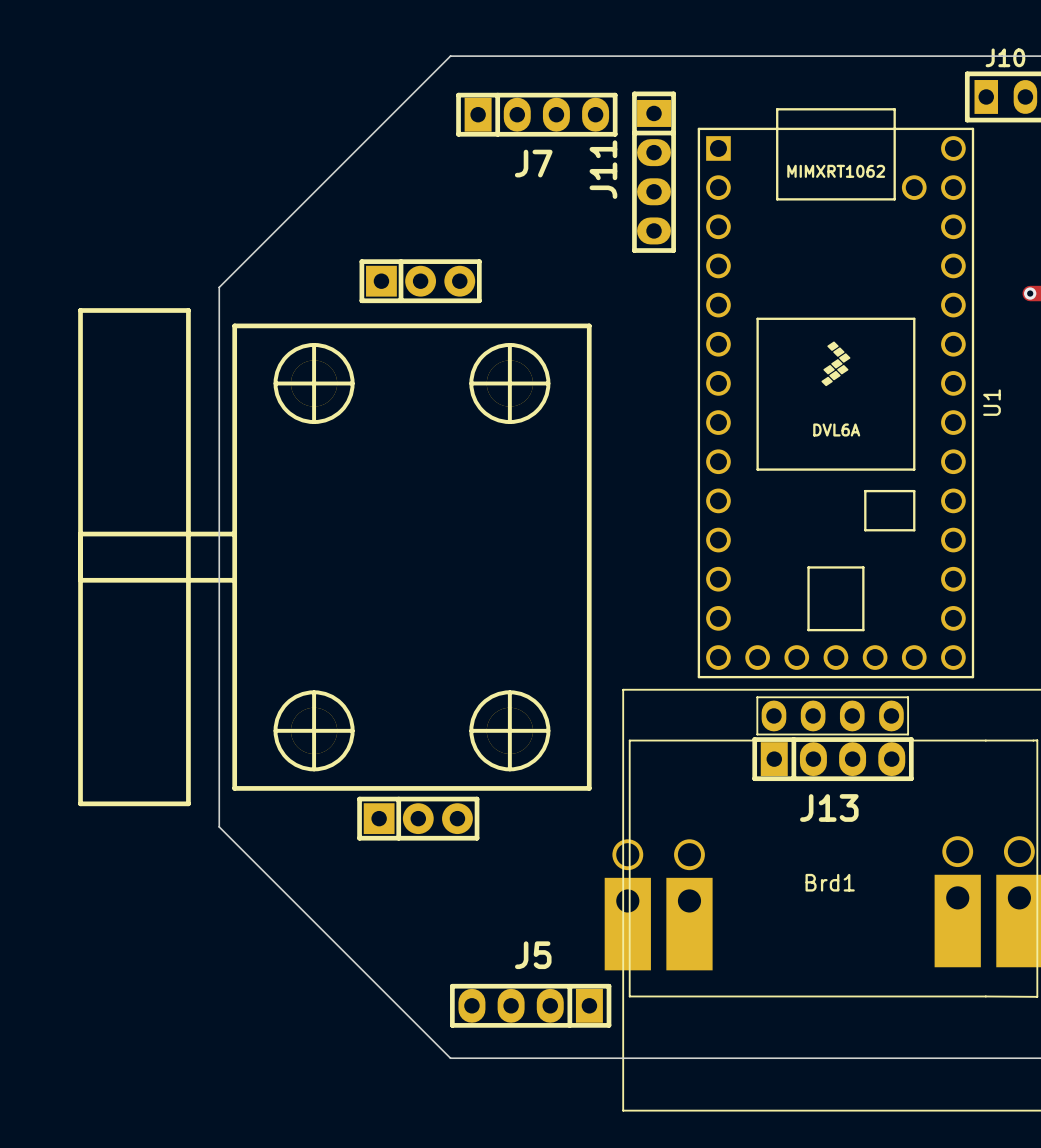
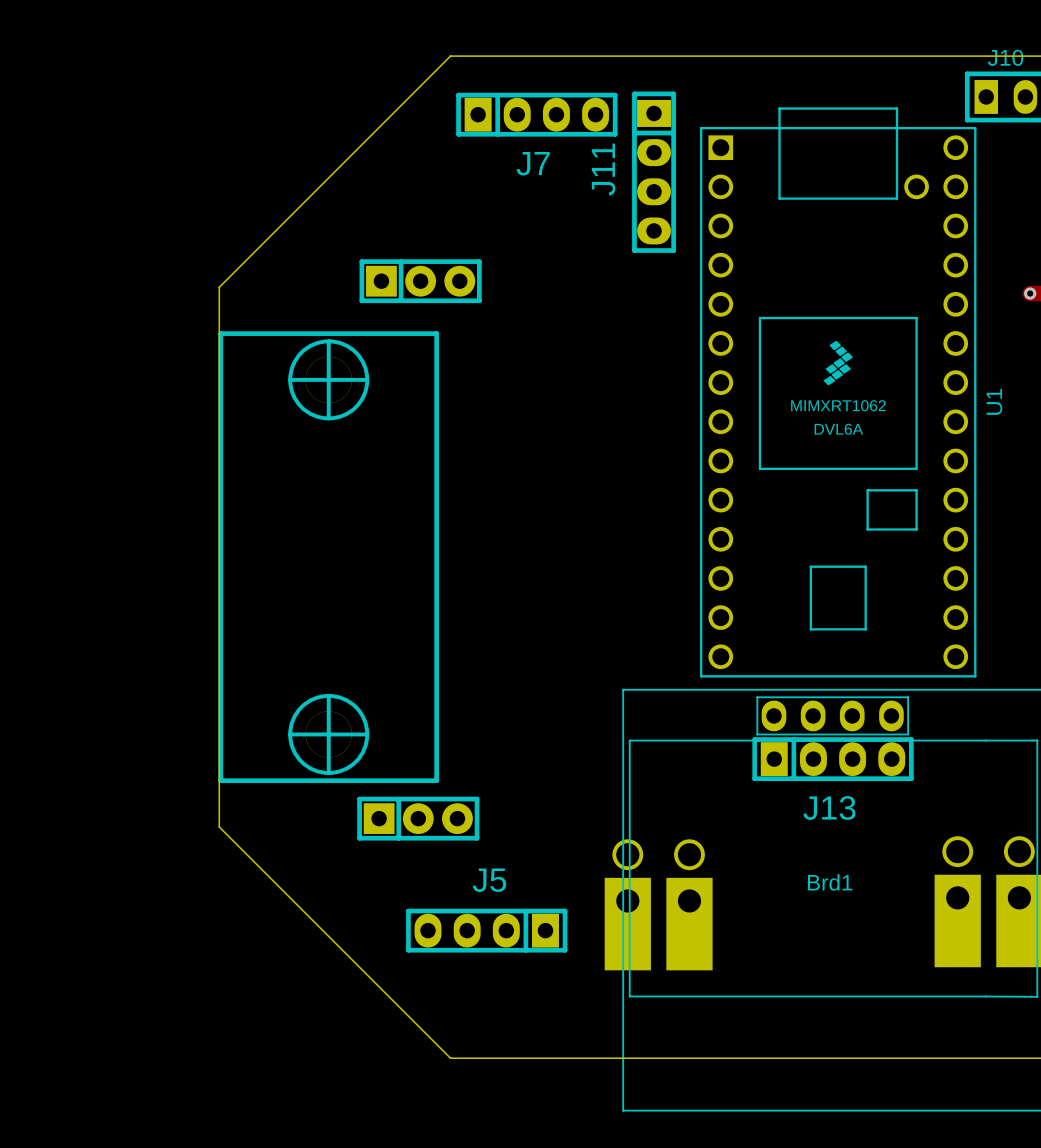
U1 footprint: [697, 108, 975, 679] -> [700, 107, 977, 678]
part footprint: [78, 308, 592, 807] -> [218, 331, 439, 784]
J5 position: (530, 1005) -> (486, 930)

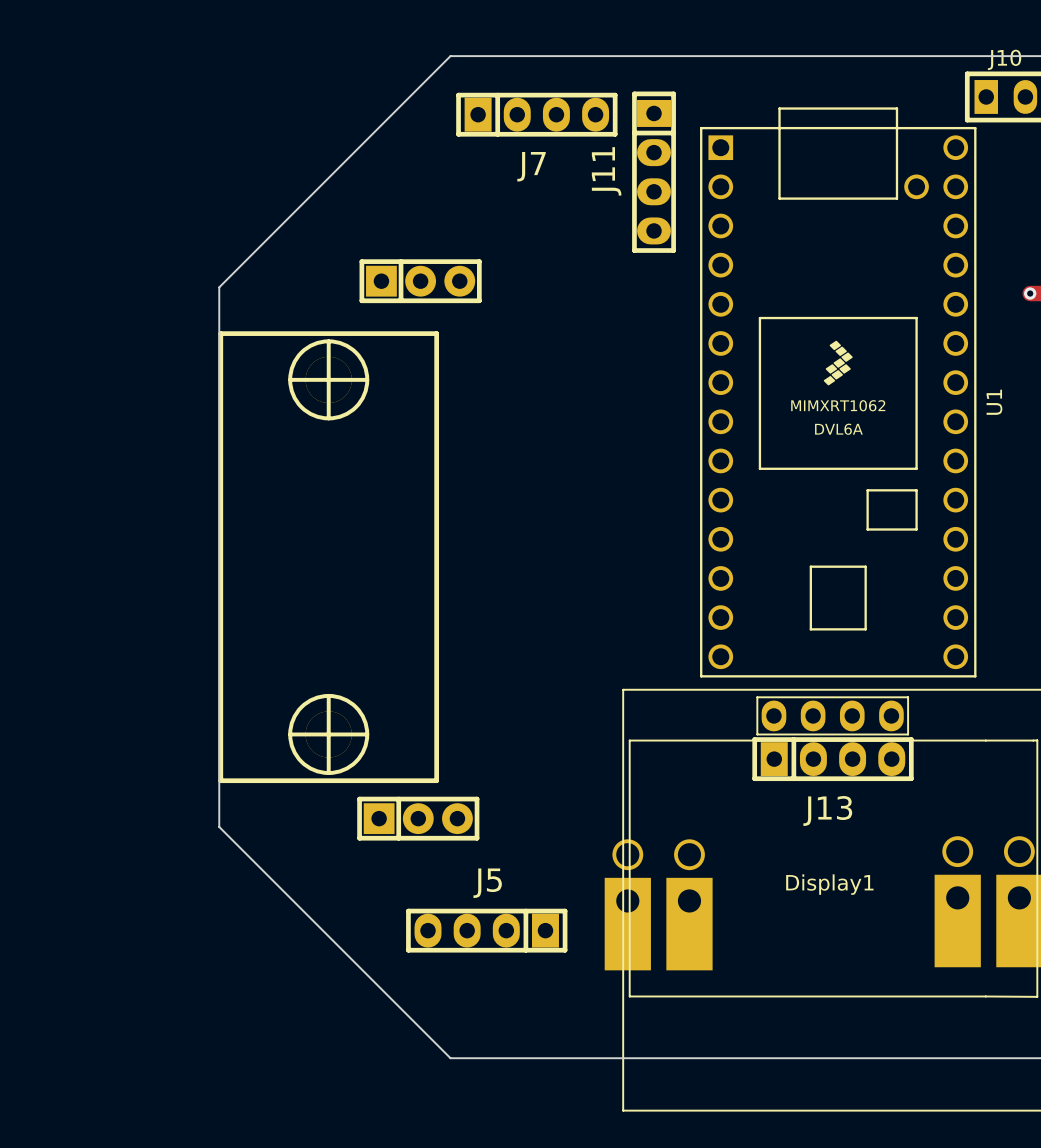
Brd1 name: Brd1 (830, 882) -> Display1 (829, 884)

